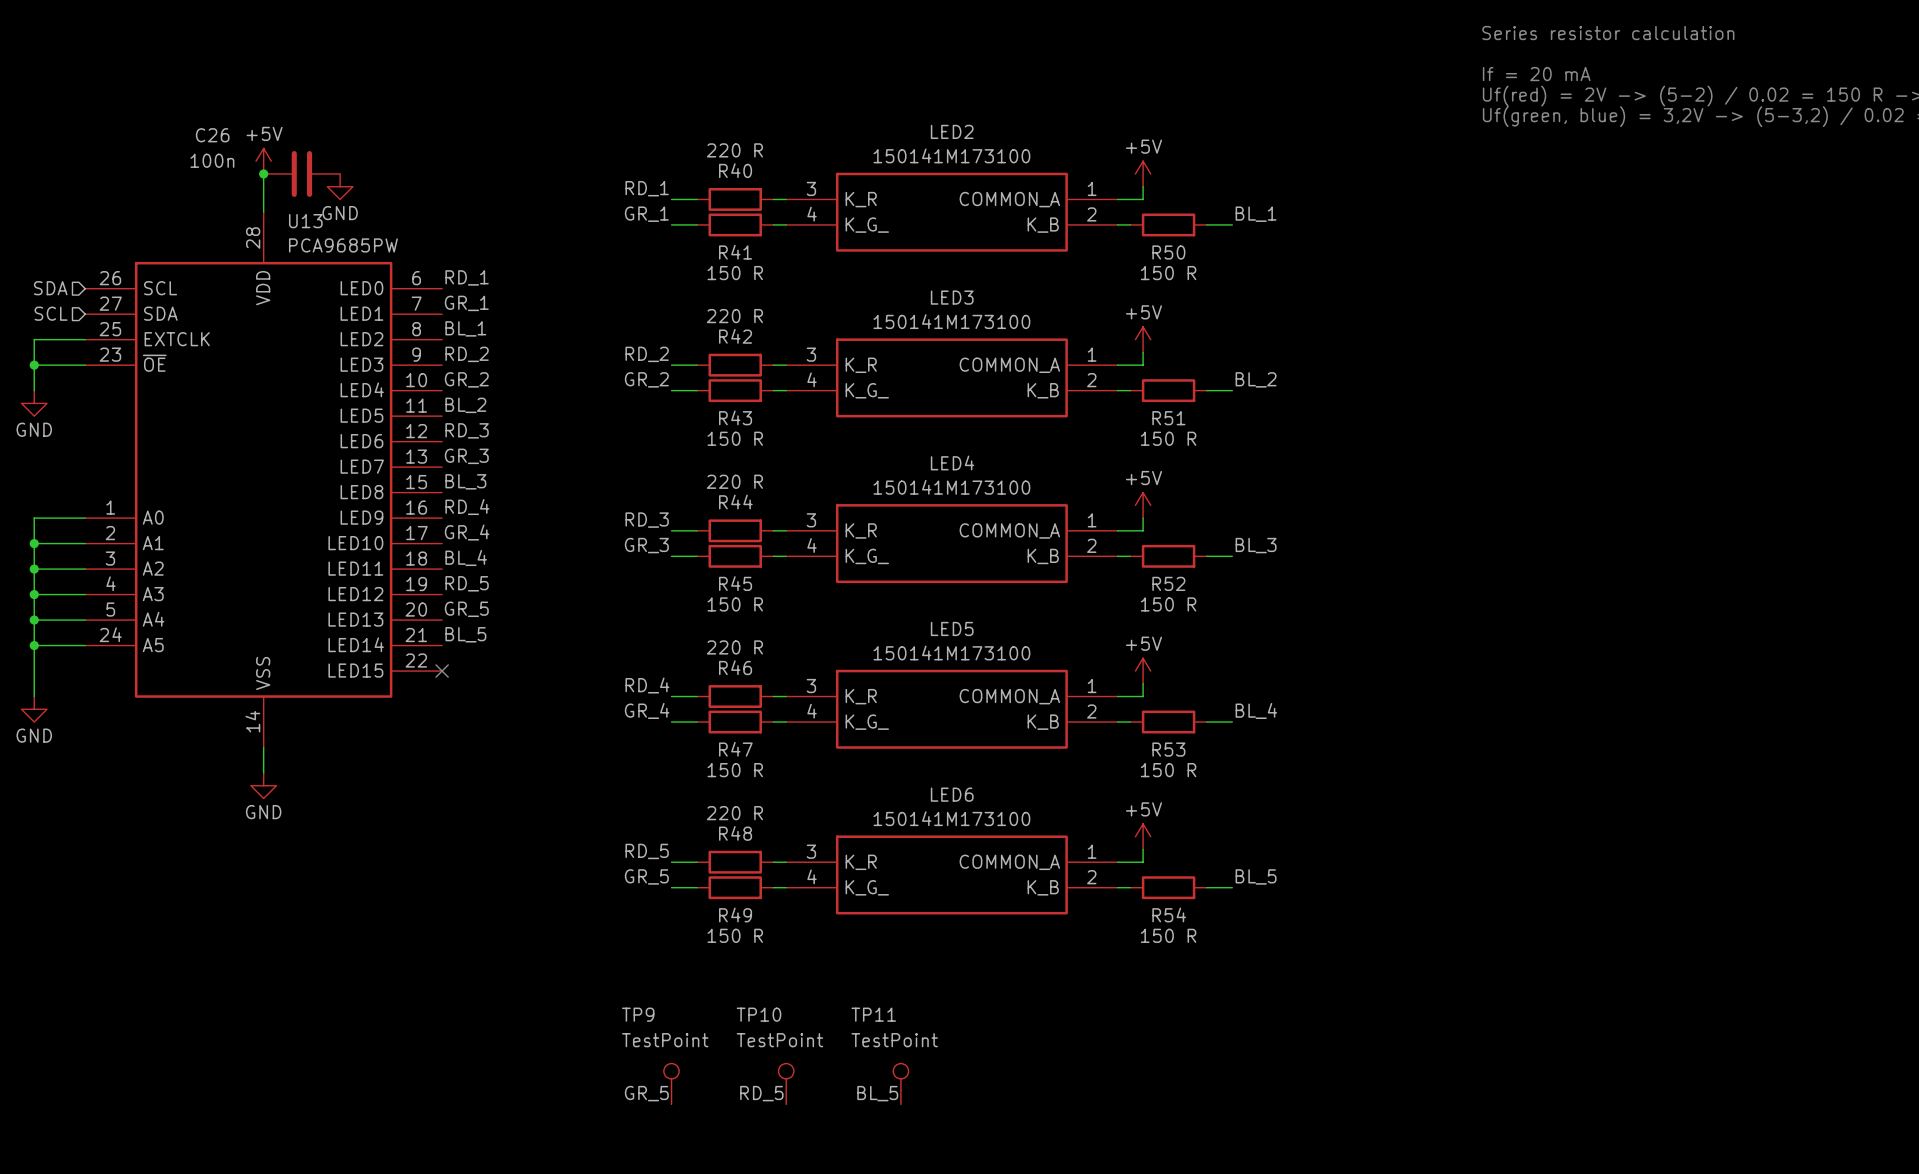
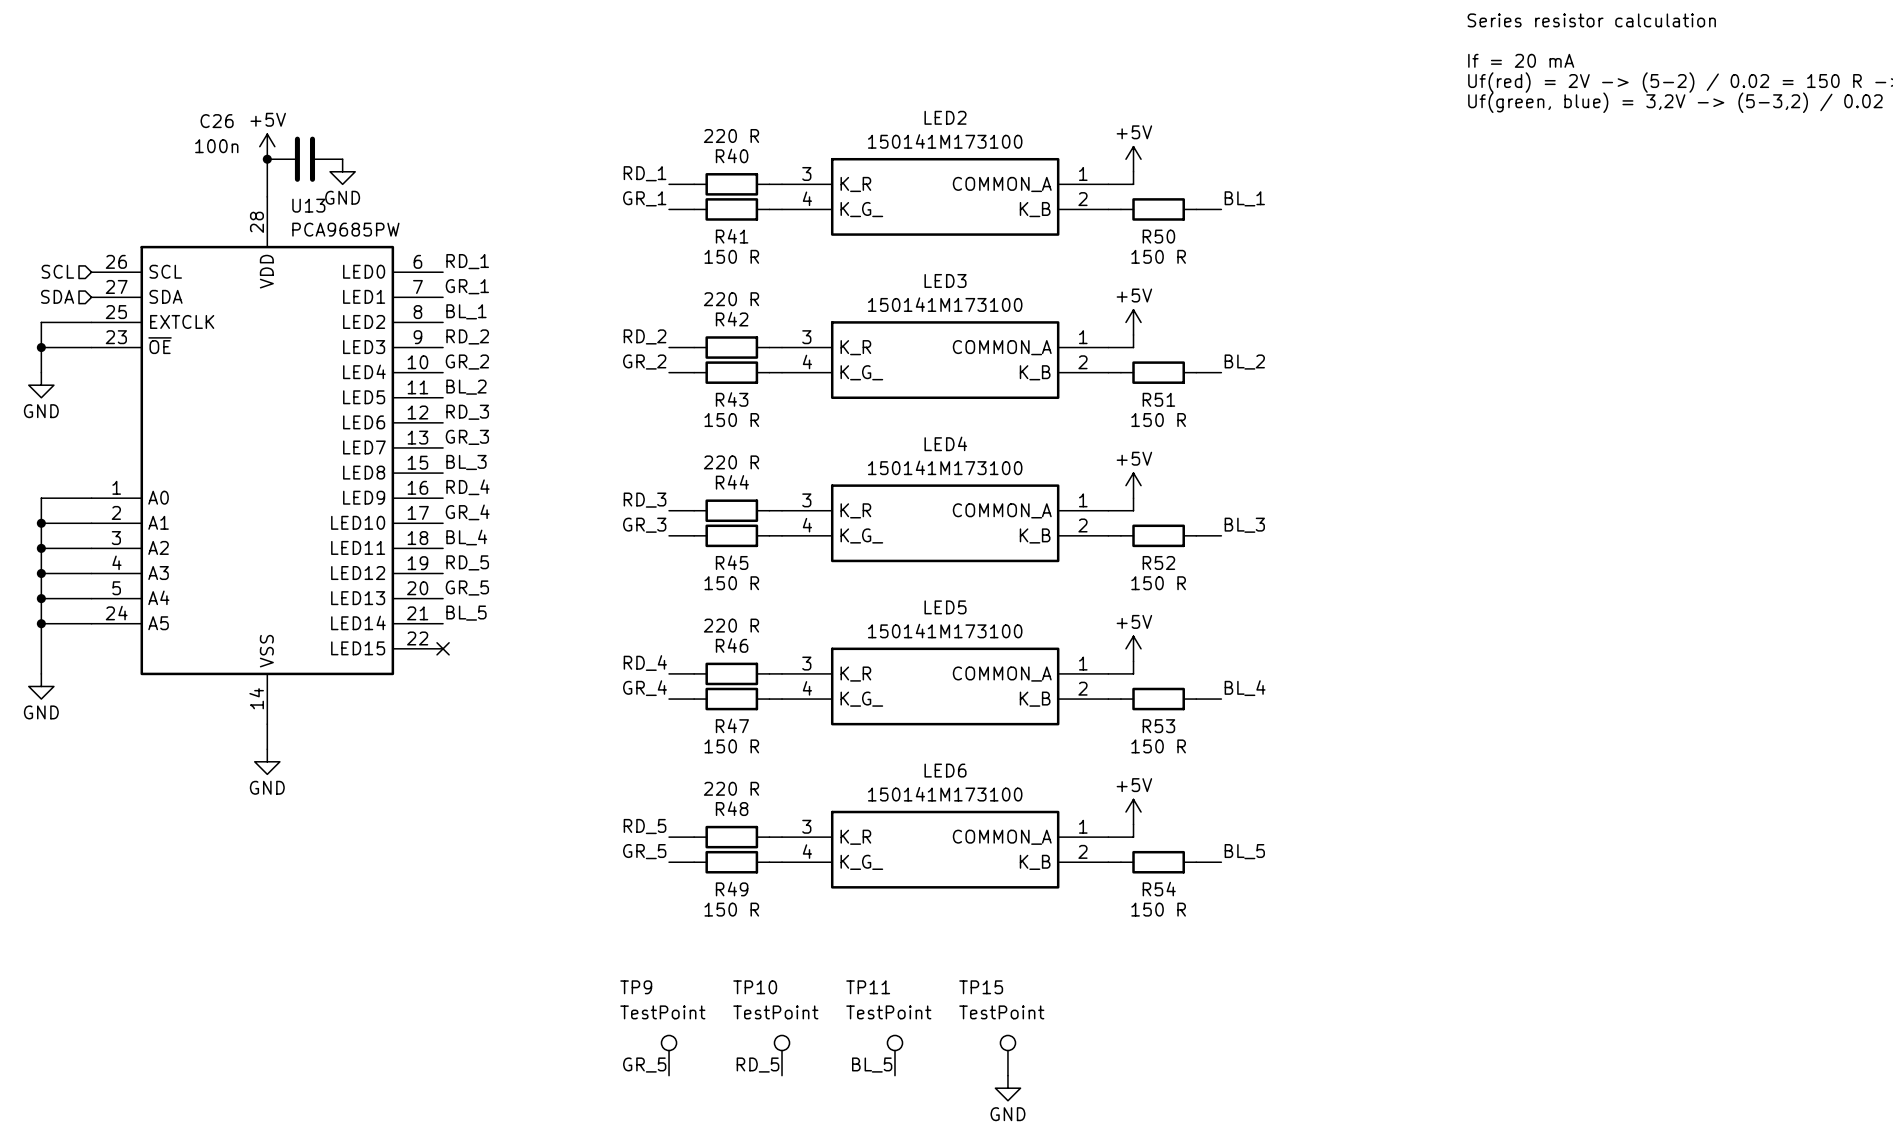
hierarchical label: SDA (50, 288) -> SCL (57, 271)
hierarchical label: SCL (51, 313) -> SDA (57, 296)
TP15: none -> TestPoint (1007, 1055)
power symbol: none -> GND (1007, 1088)

